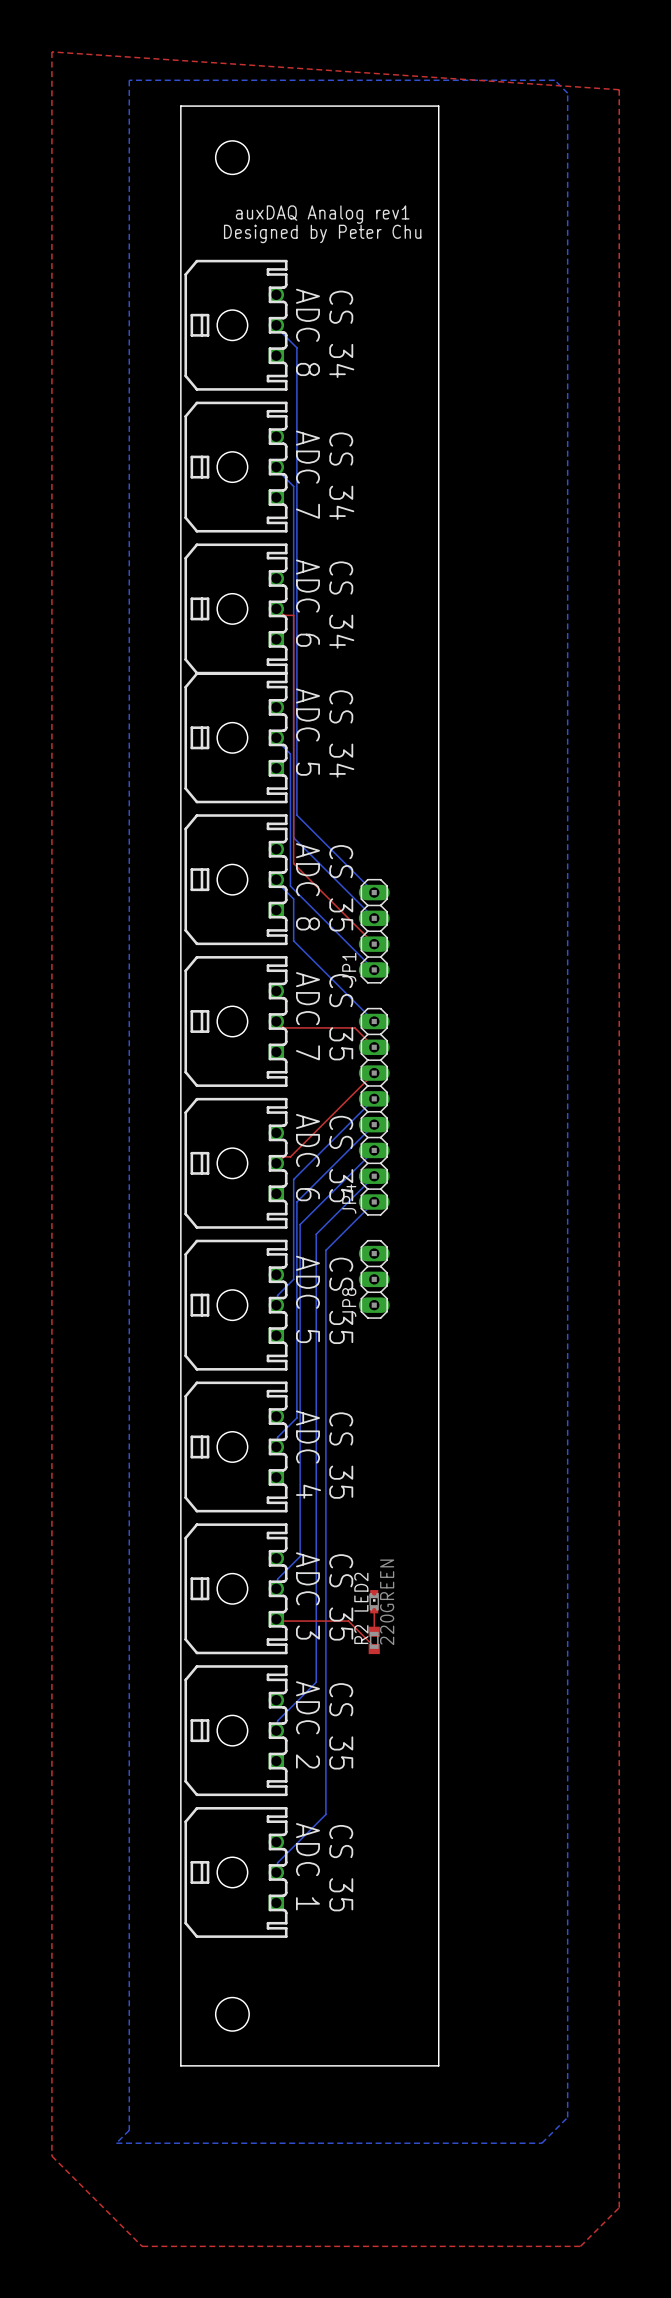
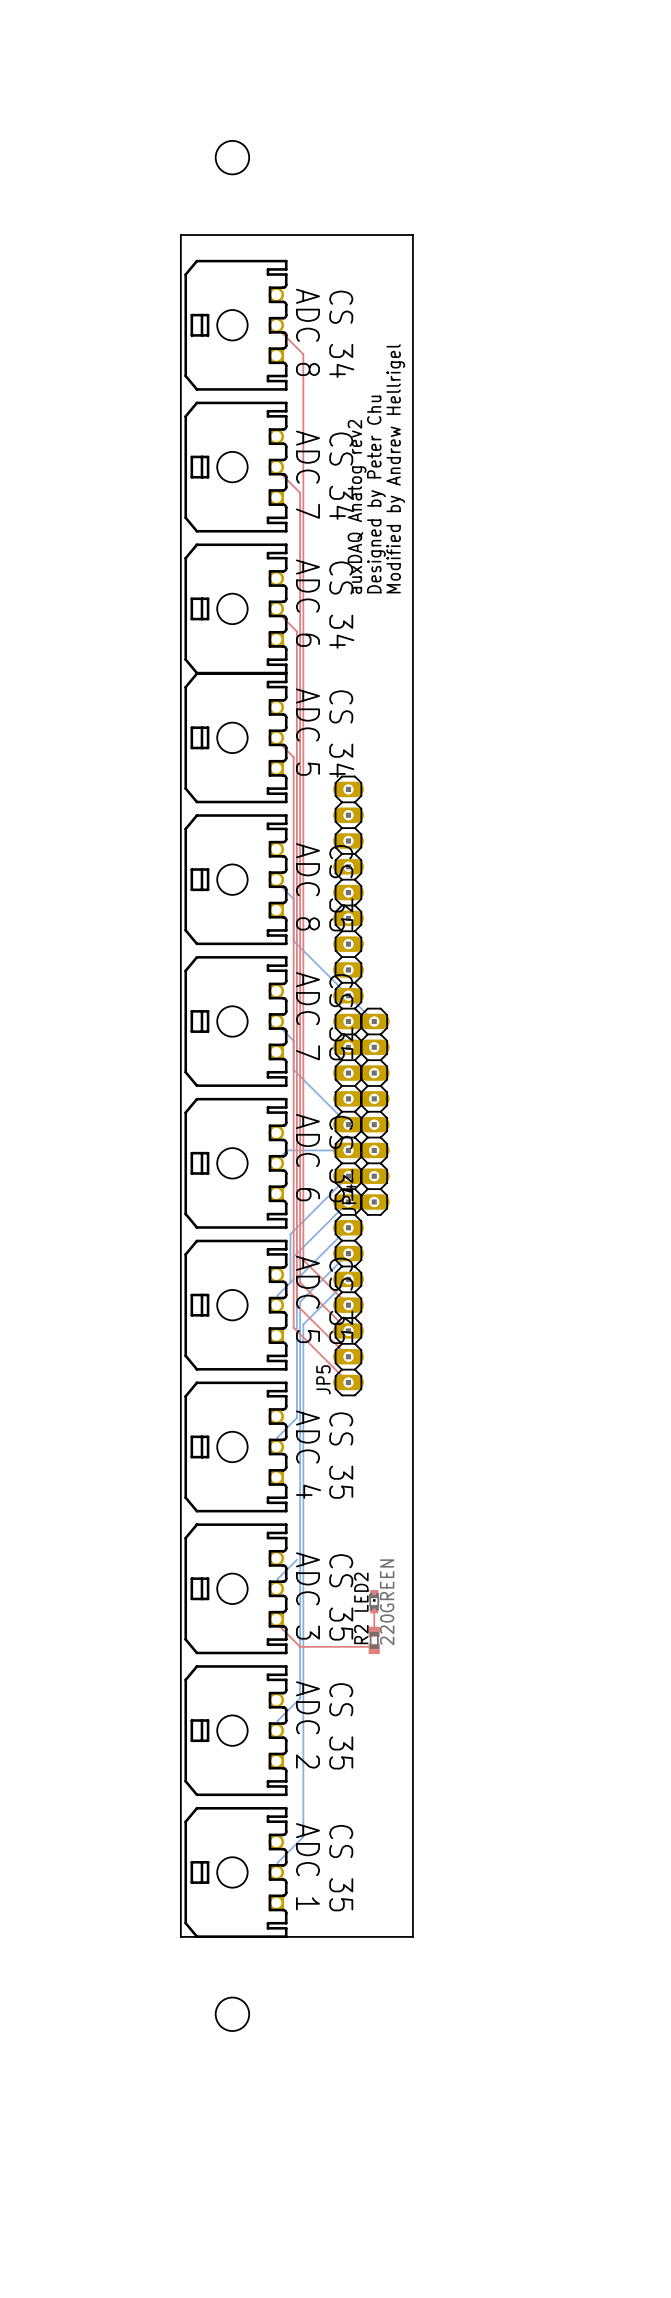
top zone outline: (51, 51) (51, 2156) (142, 2246) (580, 2246) (619, 2207) (619, 89) (51, 51) -> none
bottom zone outline: (129, 80) (129, 2130) (116, 2143) (541, 2143) (567, 2117) (567, 93) (554, 80) (129, 80) -> none
text: auxDAQ Analog rev1 (322, 214) -> none
text: Designed by Peter Chu (322, 233) -> none
board edge: (180, 235) (180, 106) (438, 106) (438, 2065) (180, 2065) (180, 1936) -> (180, 235) (412, 235) (412, 1936) (180, 1936)
top track: none -> (276, 325) (274, 325) (303, 354) (303, 1260) (348, 1305)
bottom track: (276, 325) (296, 347) (296, 815) (374, 892) -> none
top track: none -> (276, 467) (274, 467) (300, 492) (300, 1282) (348, 1330)
bottom track: (276, 467) (293, 486) (293, 837) (374, 918) -> none
text: none -> Modified by Andrew Hellrigel (395, 468)
text: none -> Designed by Peter Chu (376, 494)
text: none -> auxDAQ Analog rev2 (357, 506)
top track: (276, 608) (284, 615) (293, 615) (293, 757) -> (276, 737) (274, 737) (293, 757)
top track: none -> (276, 608) (274, 608) (296, 631) (296, 1305) (348, 1356)
bottom track: (276, 737) (290, 753) (290, 886) (374, 969) -> none
top track: (293, 863) (374, 944) -> (293, 863) (293, 1327) (348, 1382)
JP1: (374, 931) -> none
top track: (276, 1021) (284, 1027) (354, 1027) (374, 1047) -> none
bottom track: none -> (276, 1021) (274, 1021) (293, 1040) (293, 1069) (348, 1124)
top track: (374, 1073) (290, 1156) (284, 1156) (276, 1163) -> none
JP5: none -> (348, 1085)
bottom track: (374, 1098) (293, 1179) (293, 1256) -> (316, 1234) (293, 1256)
bottom track: (374, 1124) (296, 1202) (296, 1279) -> (325, 1250) (296, 1279)
bottom track: none -> (348, 1150) (287, 1150) (274, 1163) (276, 1163)
bottom track: (374, 1150) (348, 1176) -> none
bottom track: (374, 1176) (348, 1202) -> none
bottom track: (374, 1202) (348, 1227) -> none
bottom track: (300, 1224) (300, 1301) -> (300, 1224) (290, 1234) (290, 1282)
bottom track: (316, 1234) (316, 1682) (300, 1698) -> none
bottom track: (325, 1250) (325, 1814) (303, 1837) -> (348, 1279) (303, 1324) (303, 1837)
bottom track: none -> (348, 1253) (300, 1301)
JP8: (374, 1279) -> none
bottom track: (300, 1556) (296, 1559) -> (300, 1556) (300, 1698)
top track: (276, 1619) (277, 1621) (348, 1621) (374, 1646) -> (276, 1619) (274, 1621) (300, 1646) (374, 1646)

